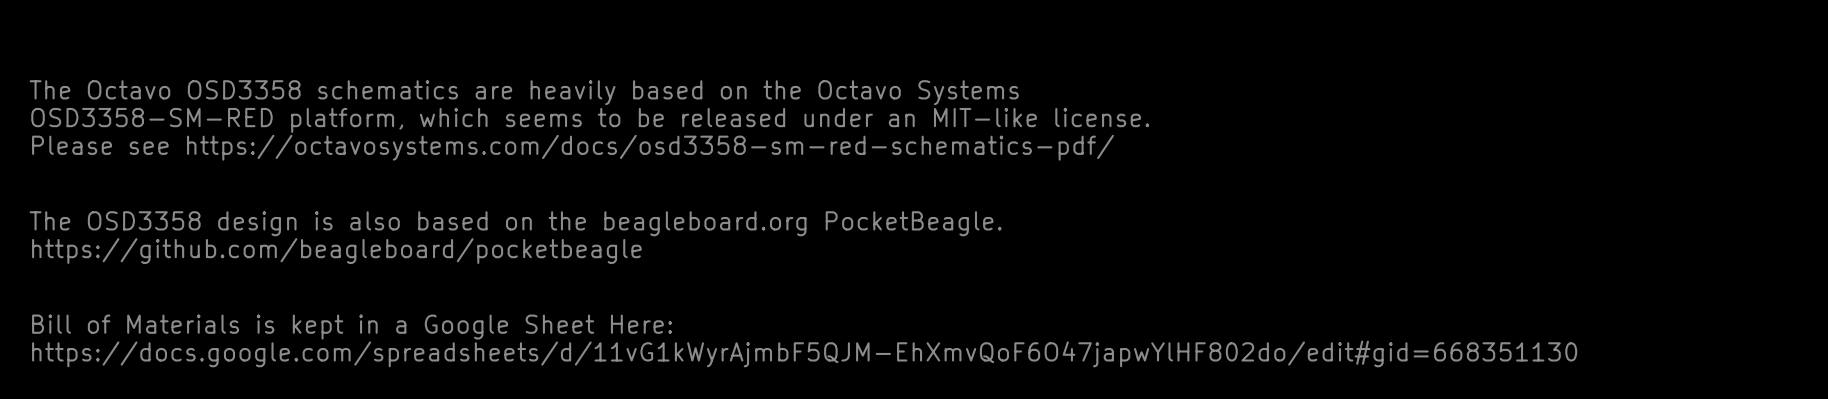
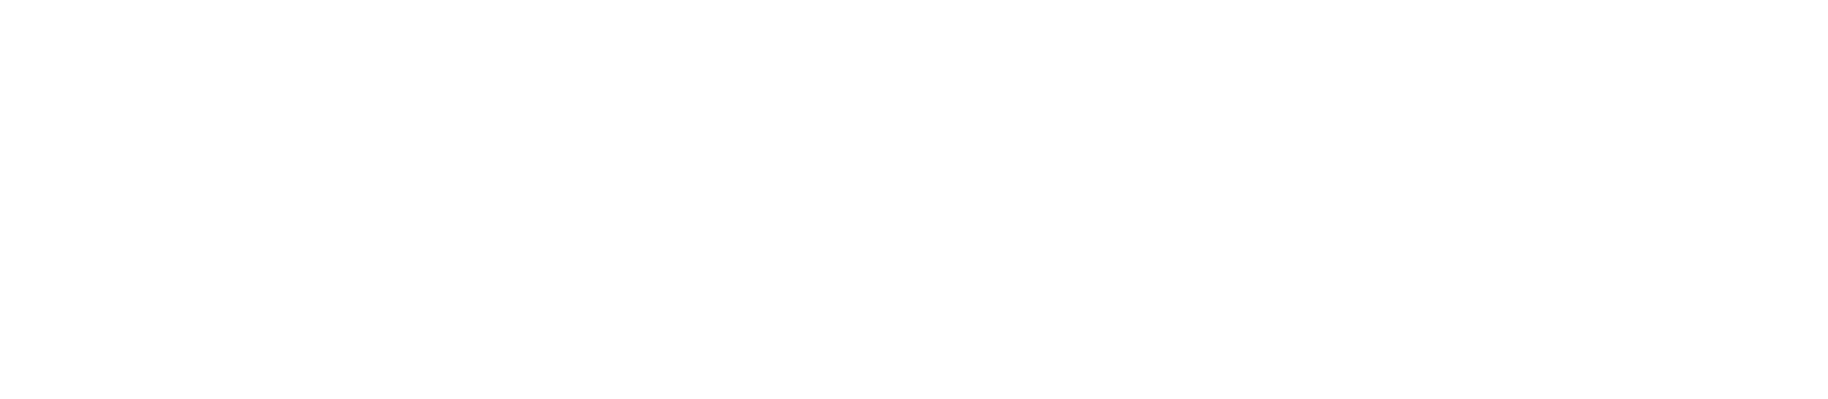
text: The Octavo OSD3358 schematics are heavily based on the Octavo Systems (524, 92) -> none
text: OSD3358-SM-RED platform, which seems to be released under an MIT-like license. (590, 120) -> none
text: Please see https://octavosystems.com/docs/osd3358-sm-red-schematics-pdf/ (573, 147) -> none
text: The OSD3358 design is also based on the beagleboard.org PocketBeagle. (515, 223) -> none
text: https://github.com/beagleboard/pocketbeagle (336, 251) -> none
text: Bill of Materials is kept in a Google Sheet Here: (352, 327) -> none
text: https://docs.google.com/spreadsheets/d/11vG1kWyrAjmbF5QJM-EhXmvQoF6O47japwYlHF802do/edit#gid=668351130 (804, 353) -> none

